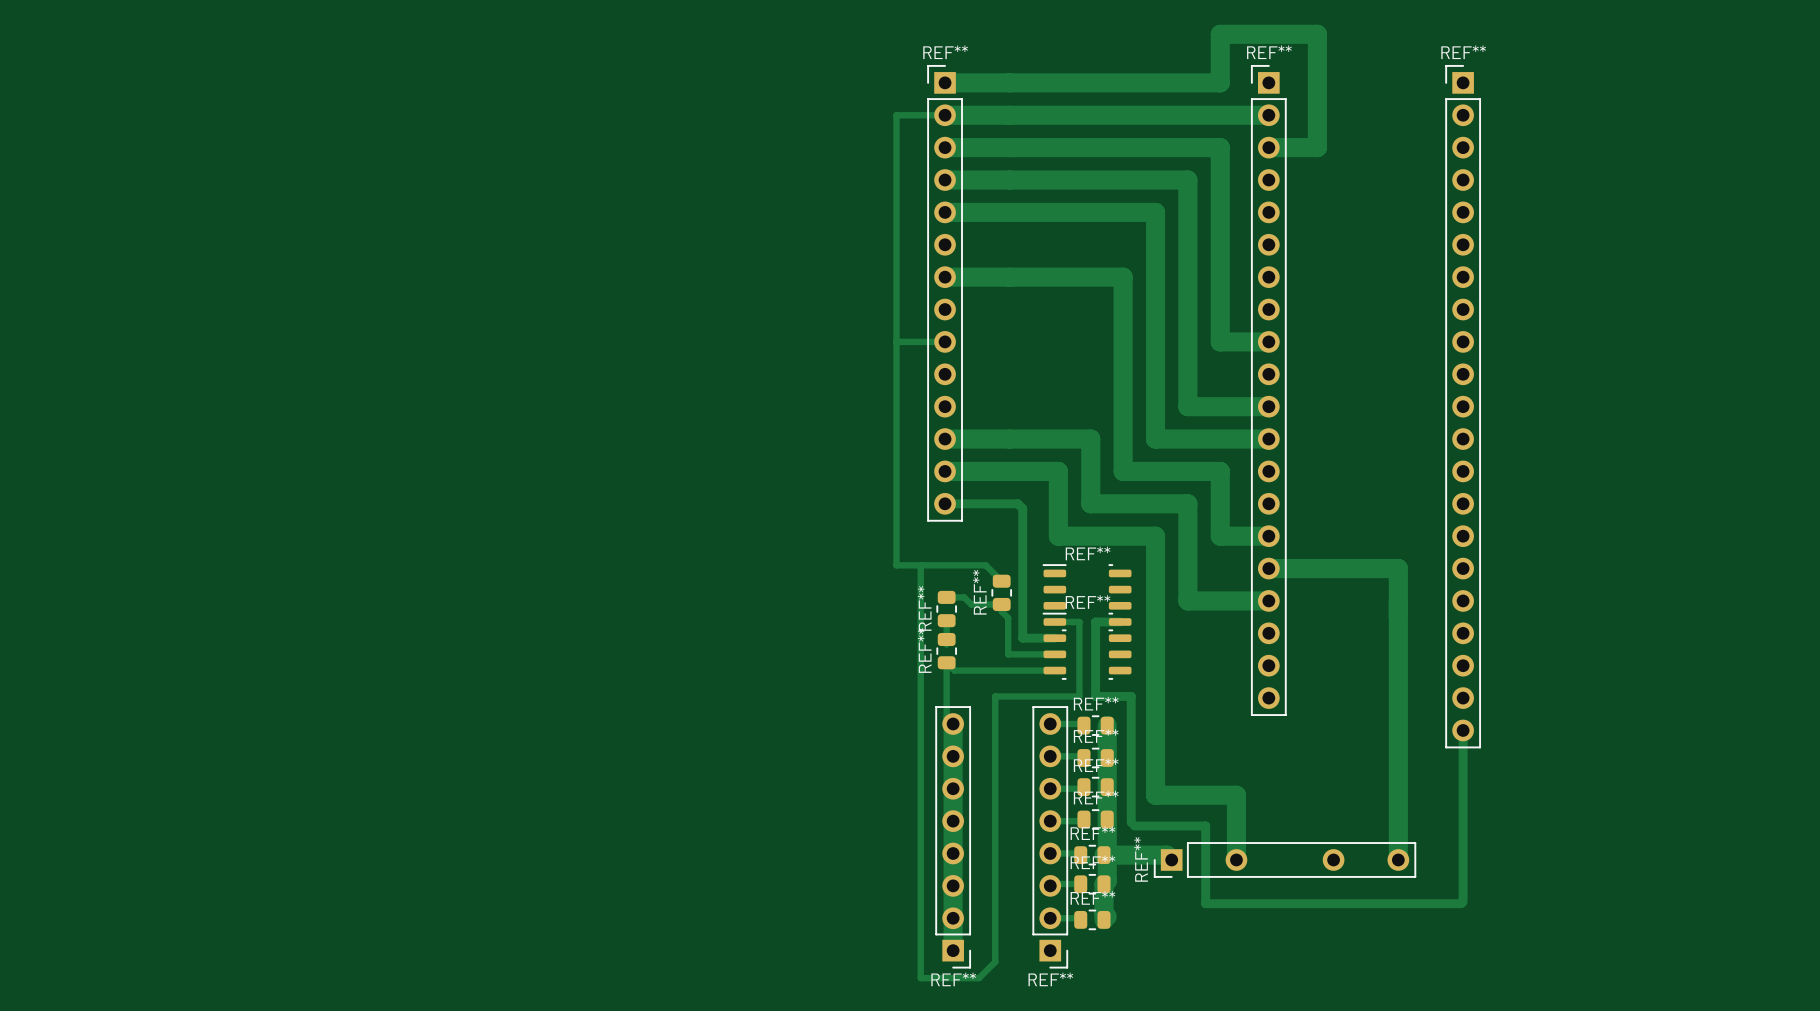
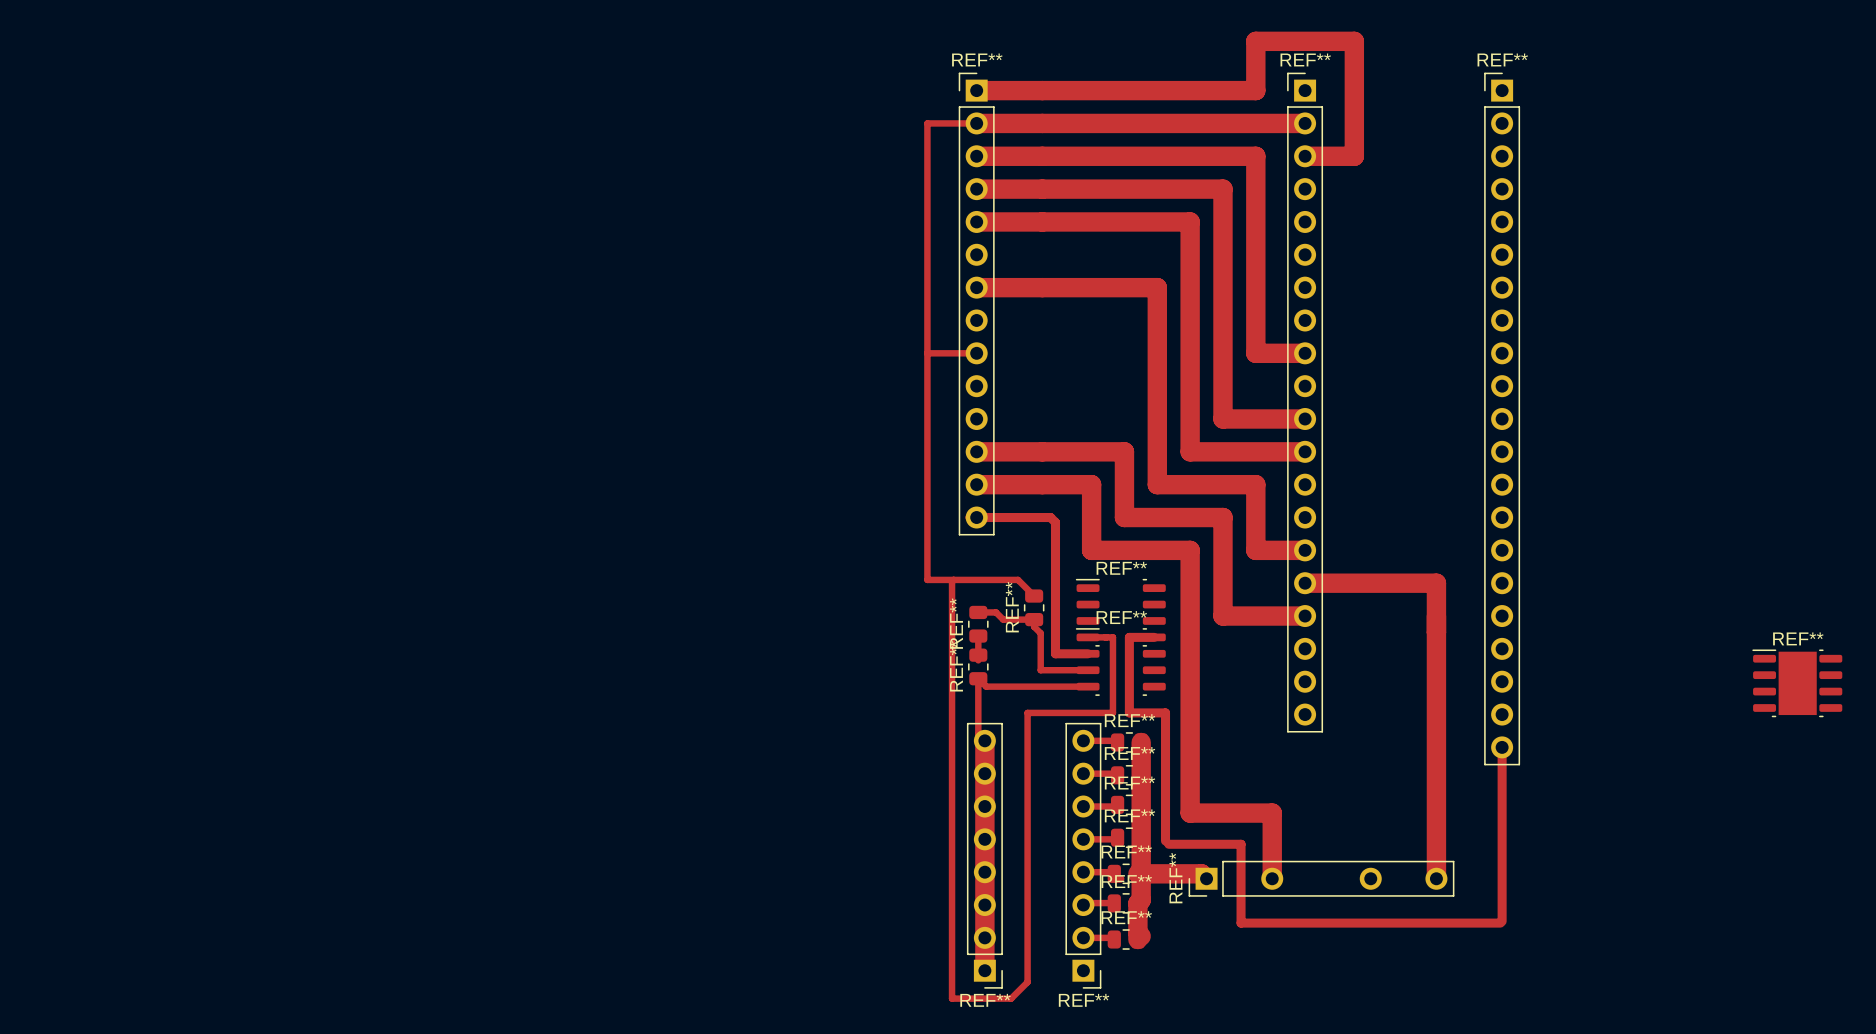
REF**: none -> (1797, 683)

